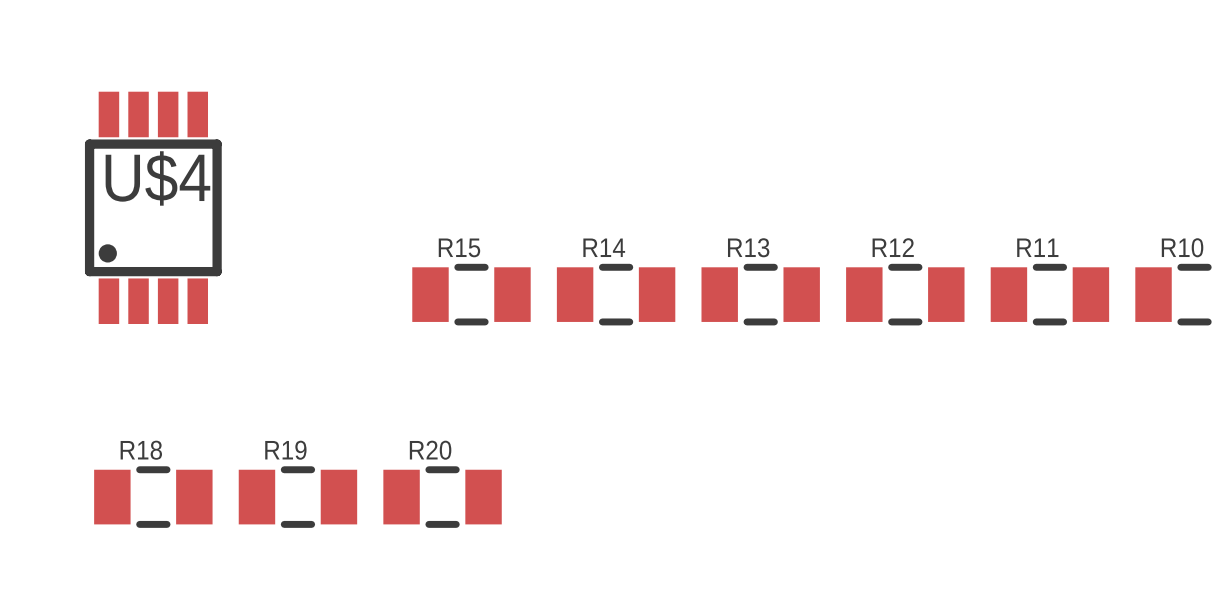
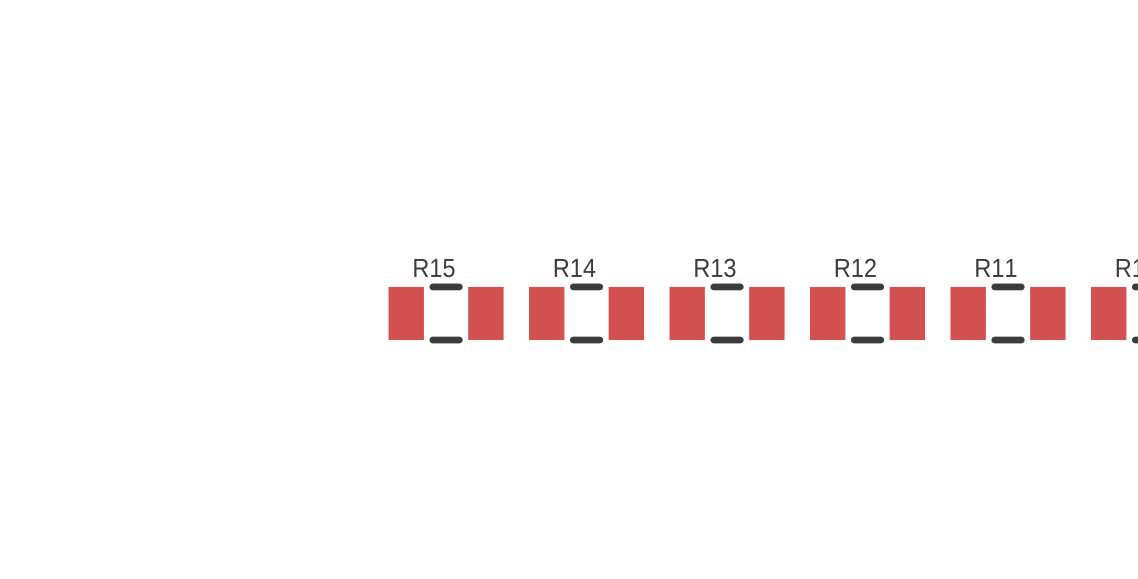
U$4: (153, 207) -> none
R18: (153, 497) -> none
R19: (297, 497) -> none
R20: (442, 497) -> none

